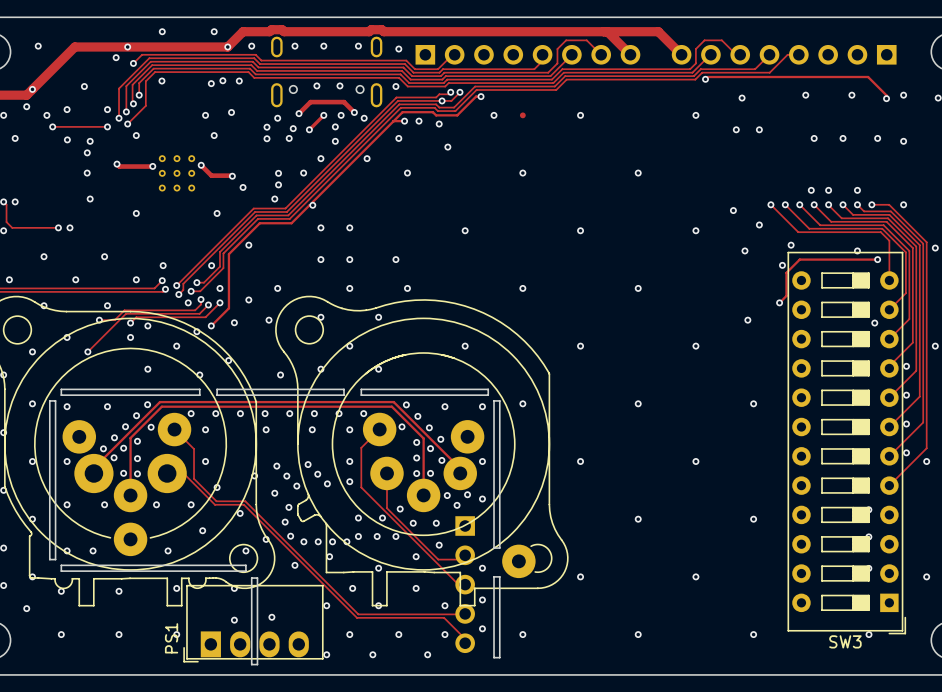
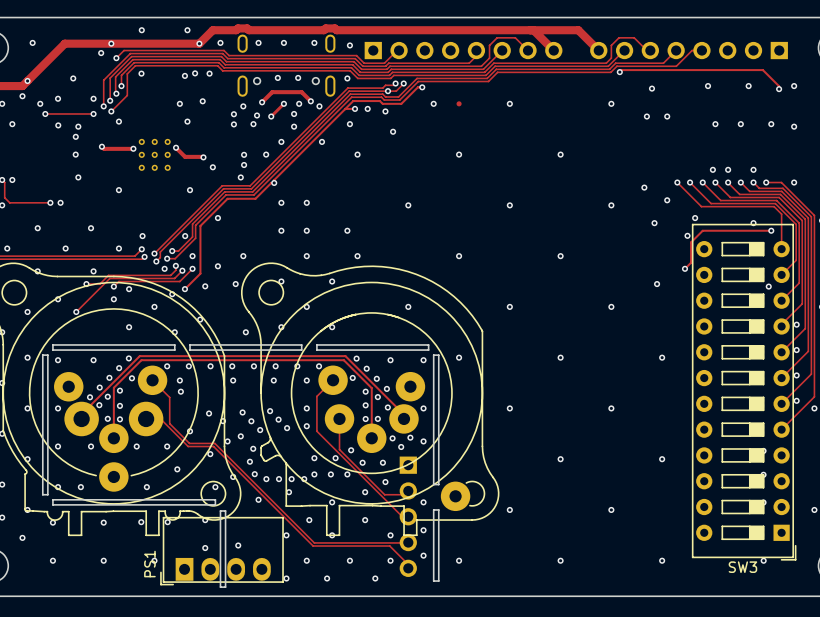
via: none -> (180, 391)
via: (205, 461) -> none
via: none -> (209, 413)
via: none -> (227, 441)
via: (176, 588) -> none
via: none -> (141, 522)
via: none -> (167, 522)

